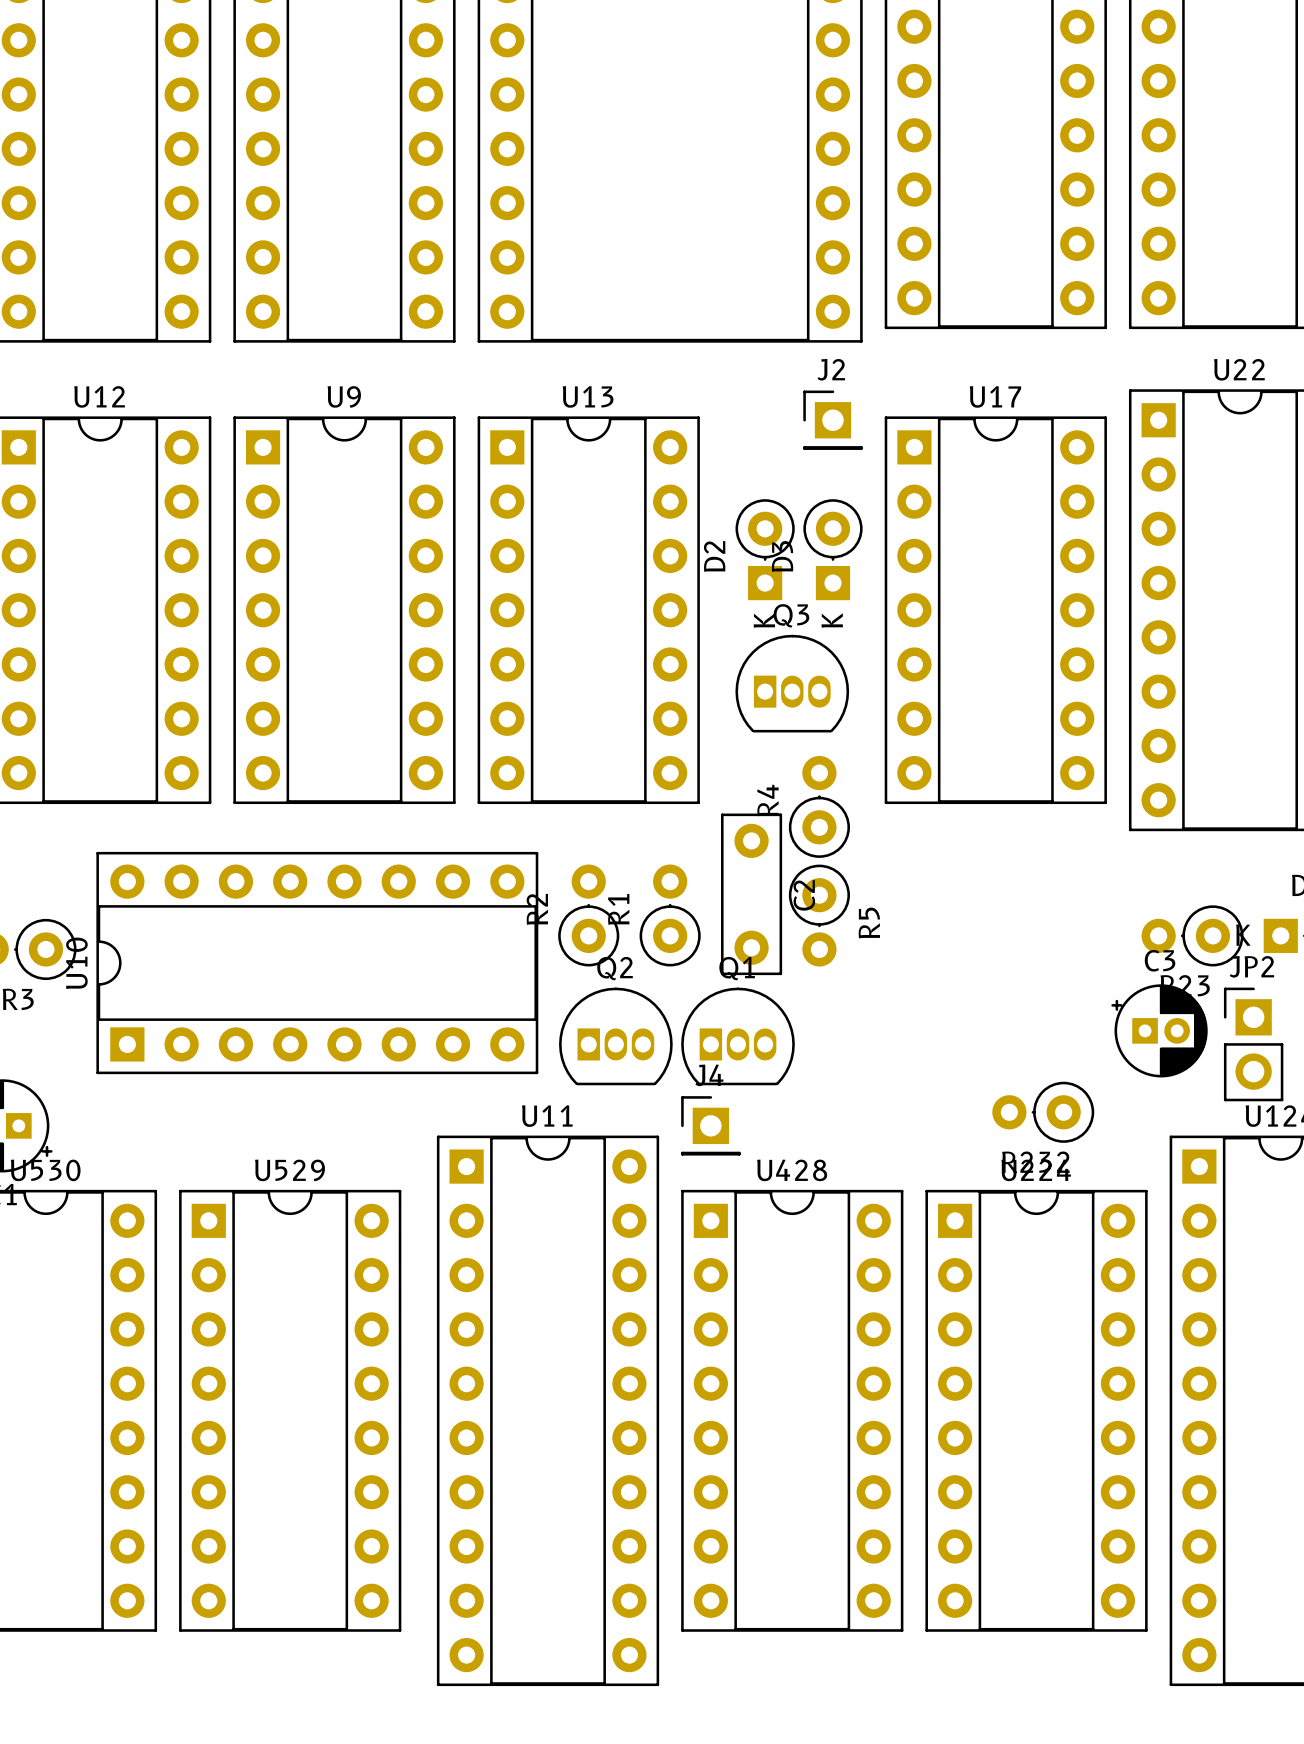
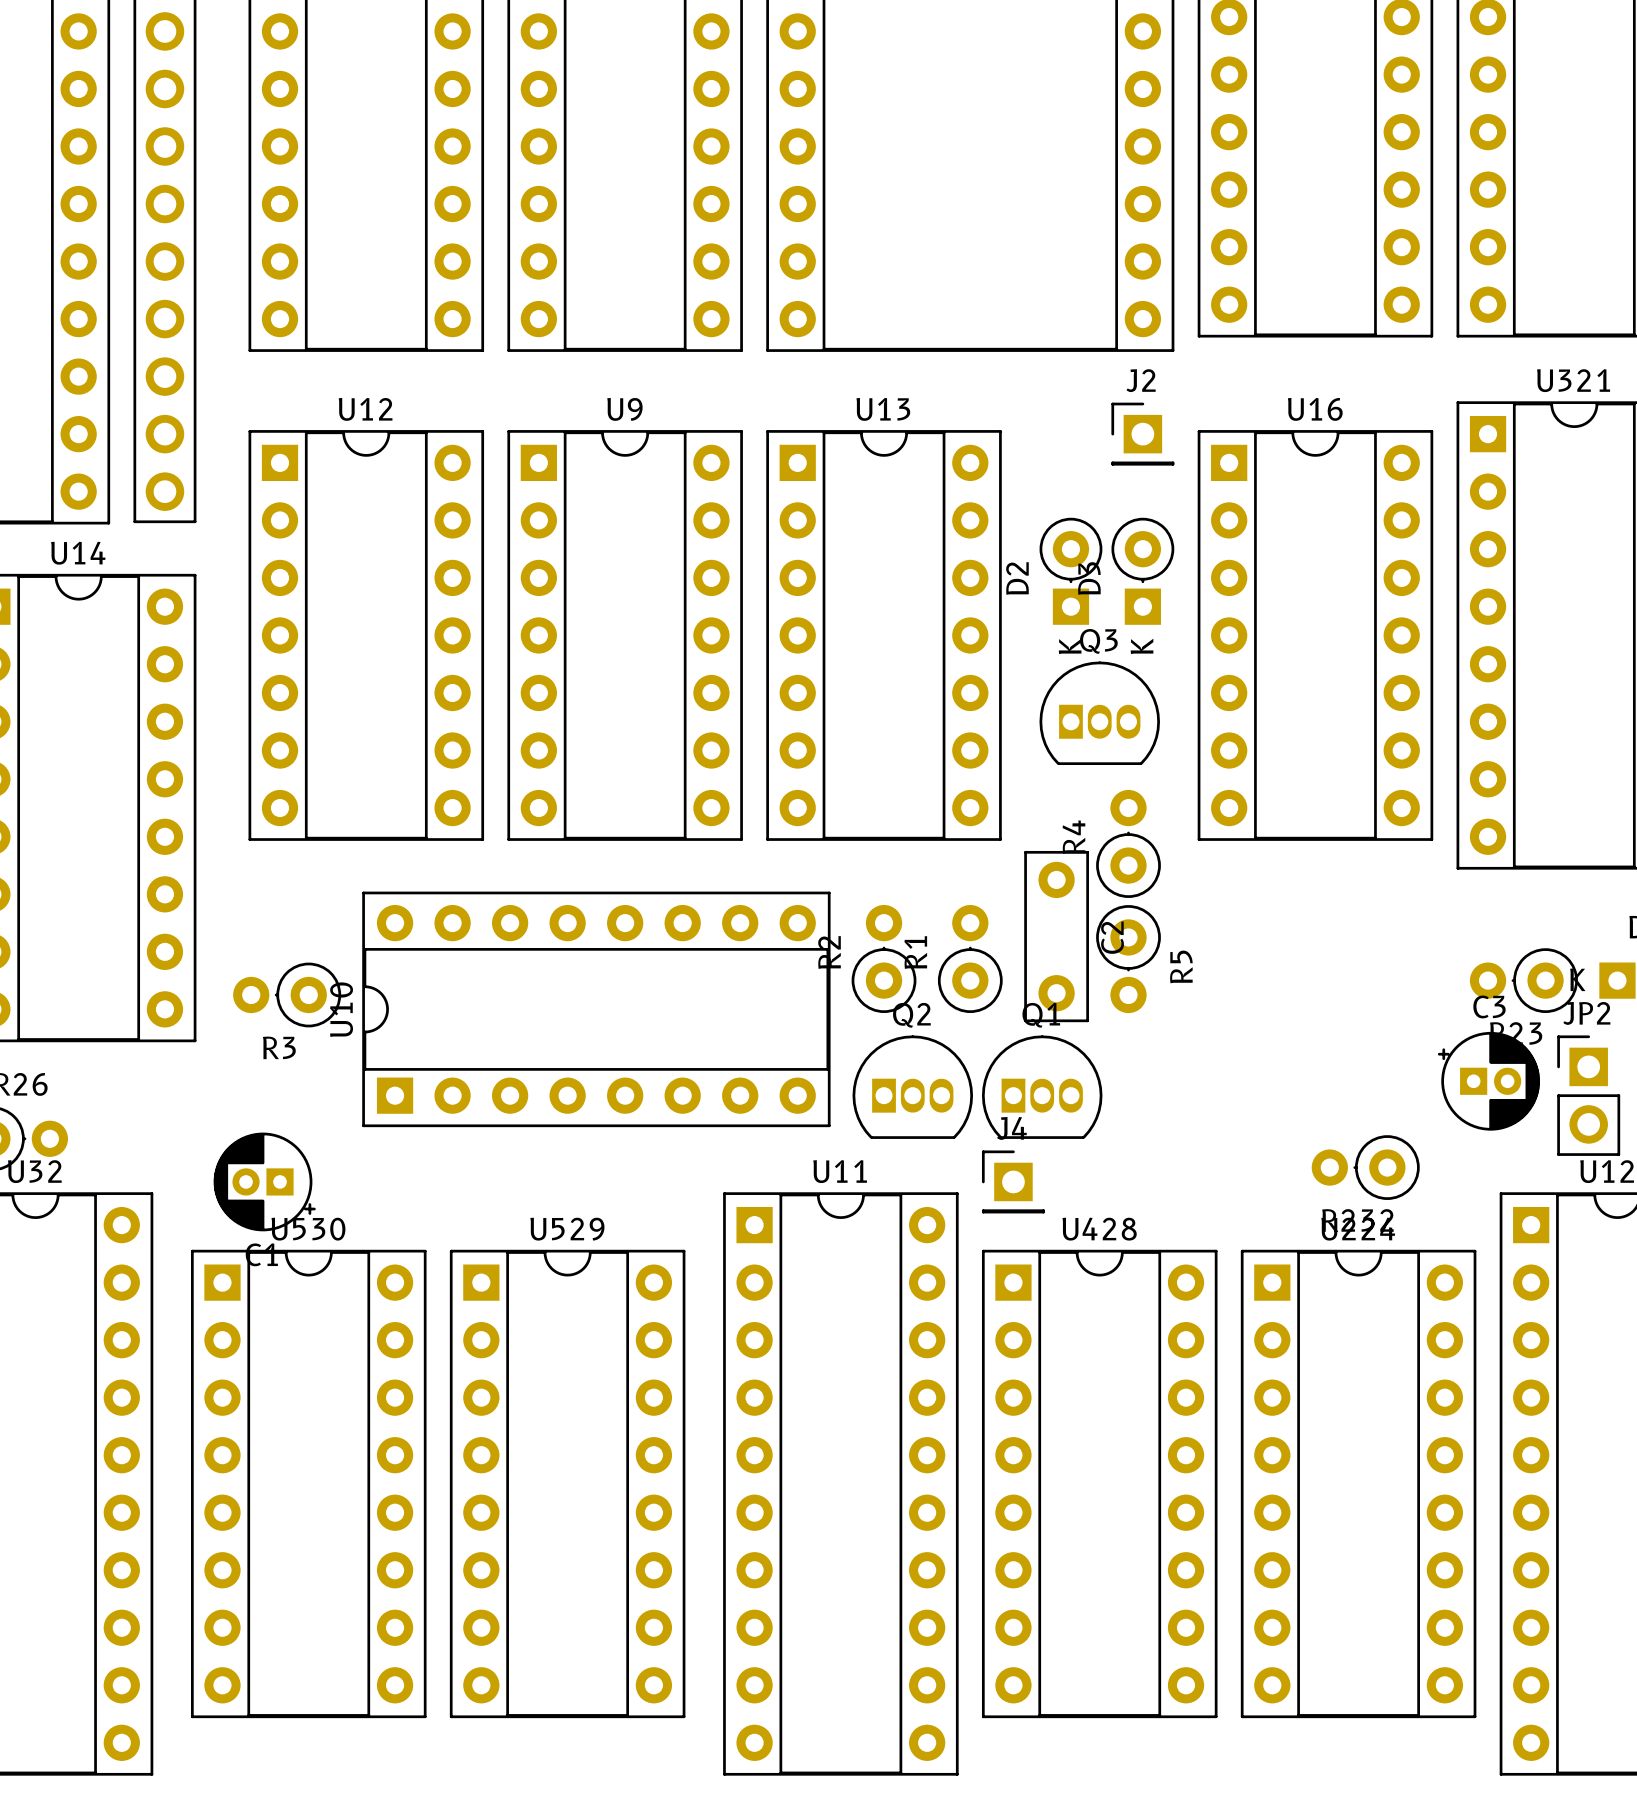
U22 name: U22 (1239, 369) -> U321 (1573, 380)
U17 name: U17 (995, 396) -> U16 (1315, 409)

